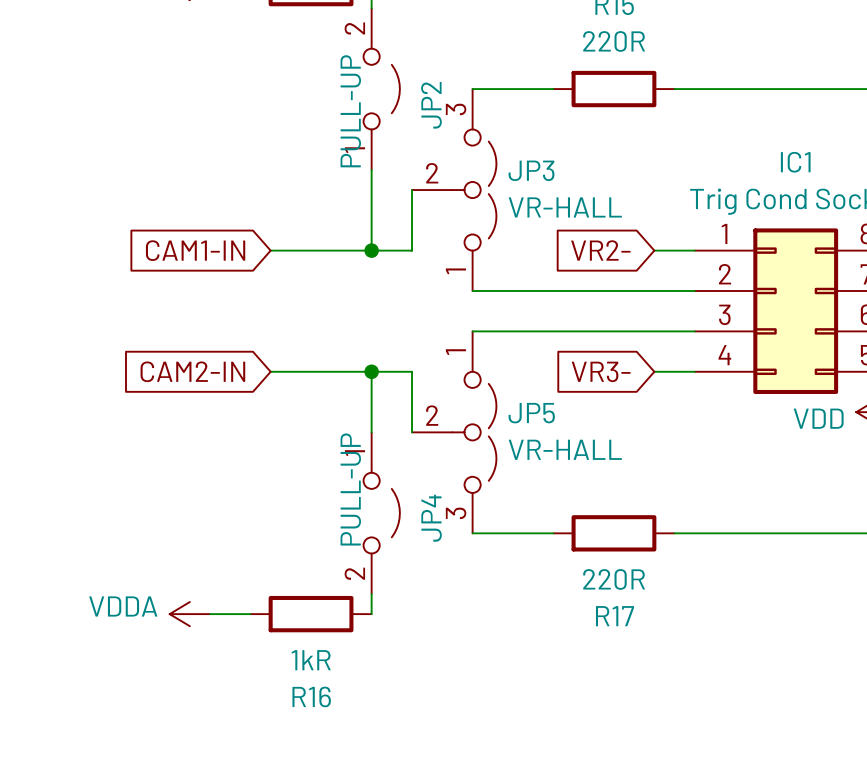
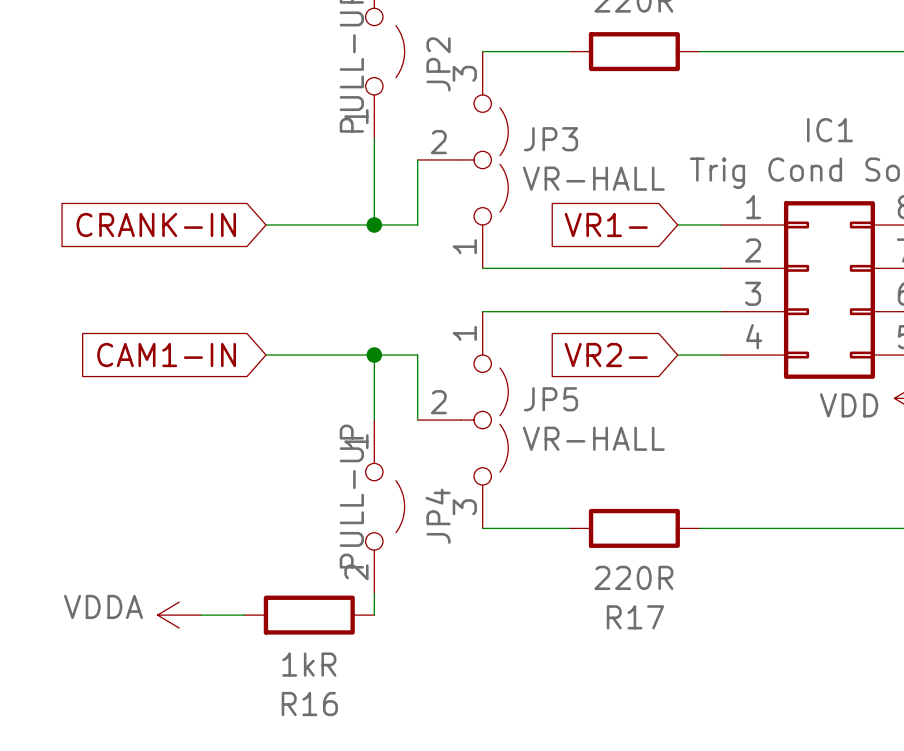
global label: CAM1-IN (195, 250) -> CRANK-IN (156, 224)
global label: VR2- (600, 250) -> VR1- (606, 224)
global label: CAM2-IN (192, 371) -> CAM1-IN (166, 355)
global label: VR3- (601, 371) -> VR2- (606, 355)

